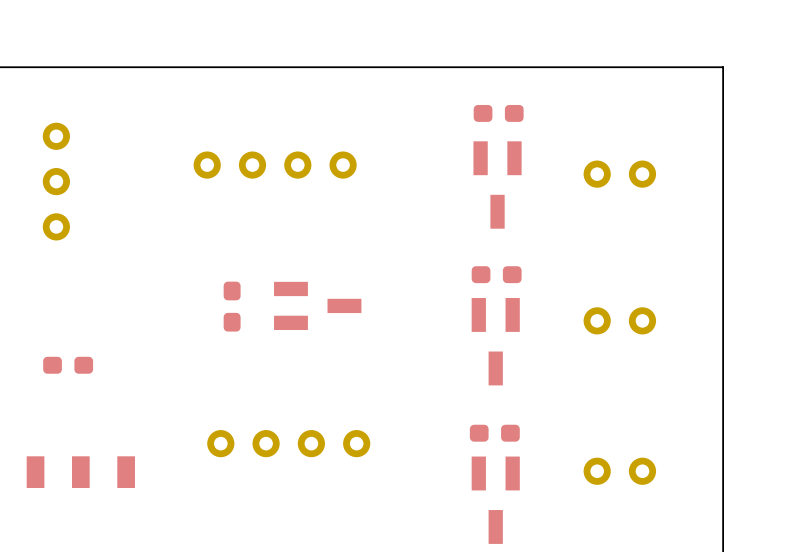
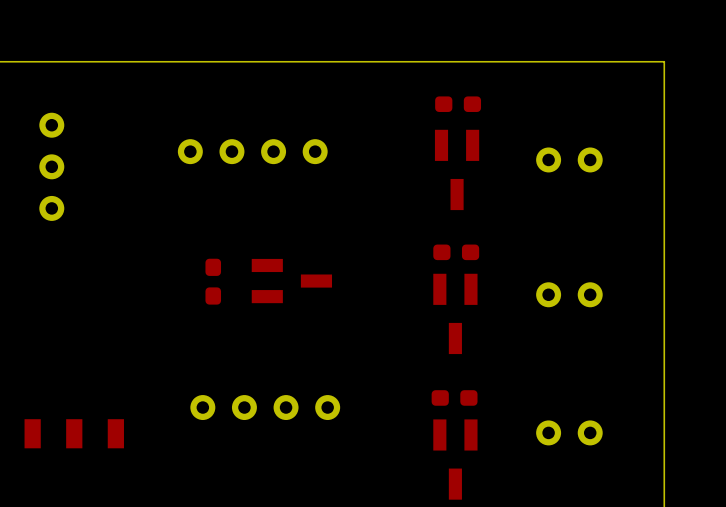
part: (68, 365) -> none

